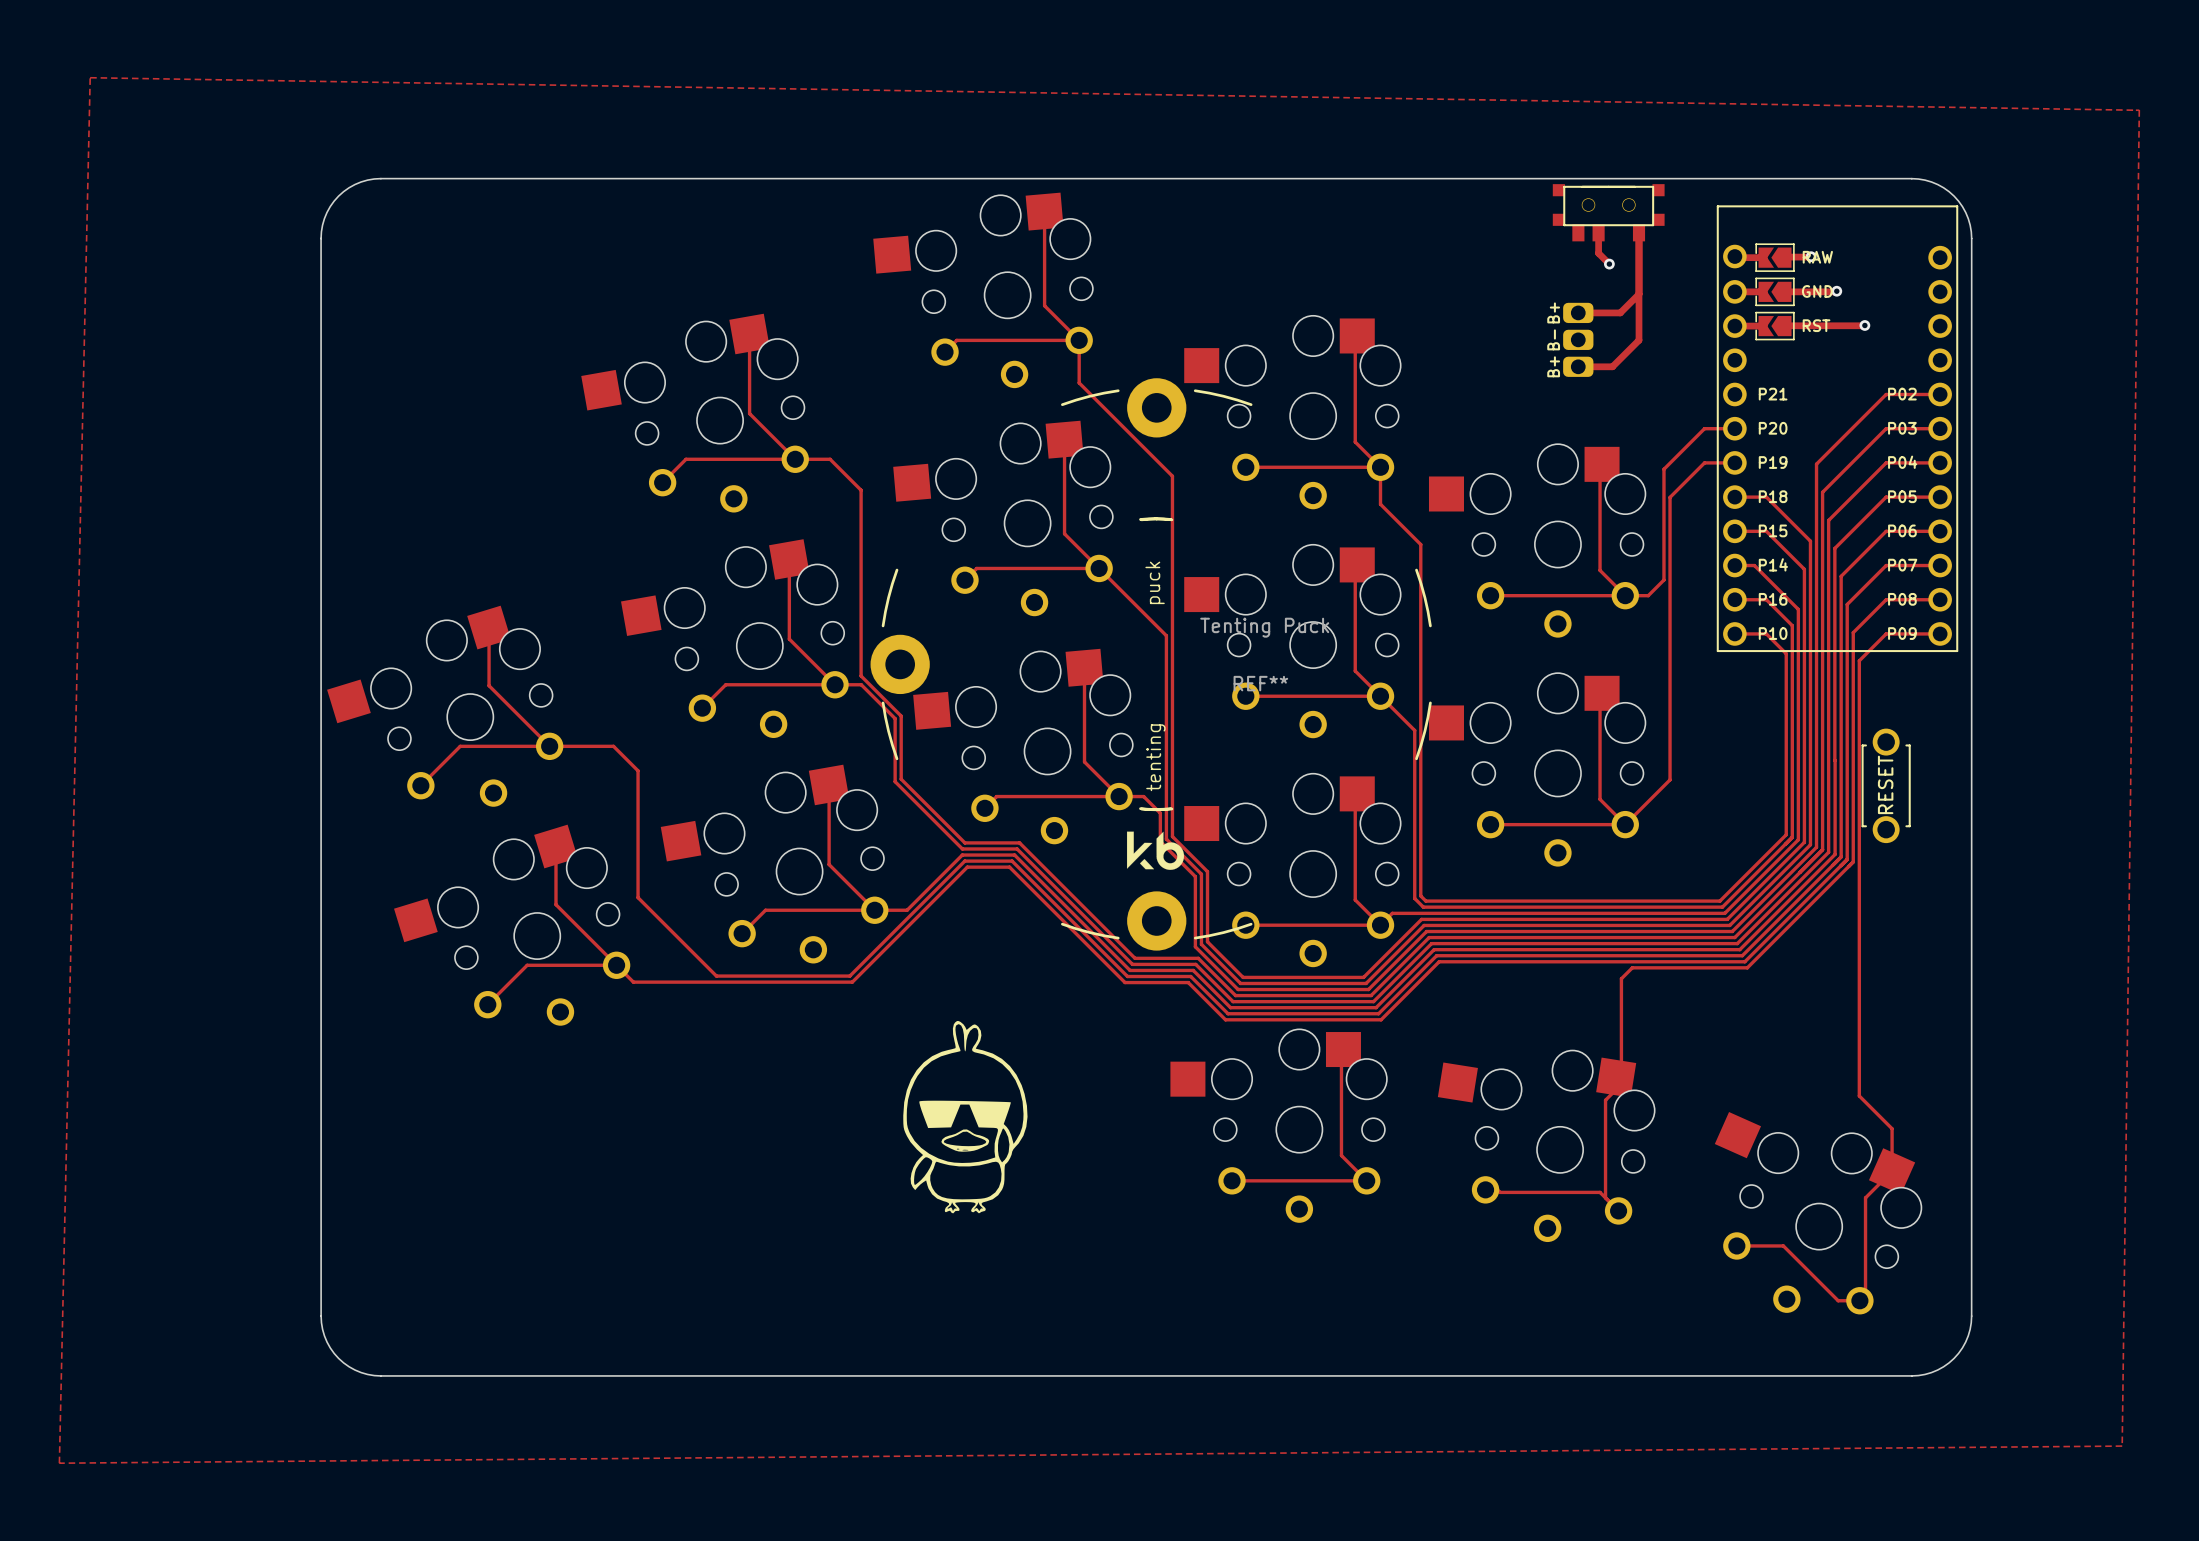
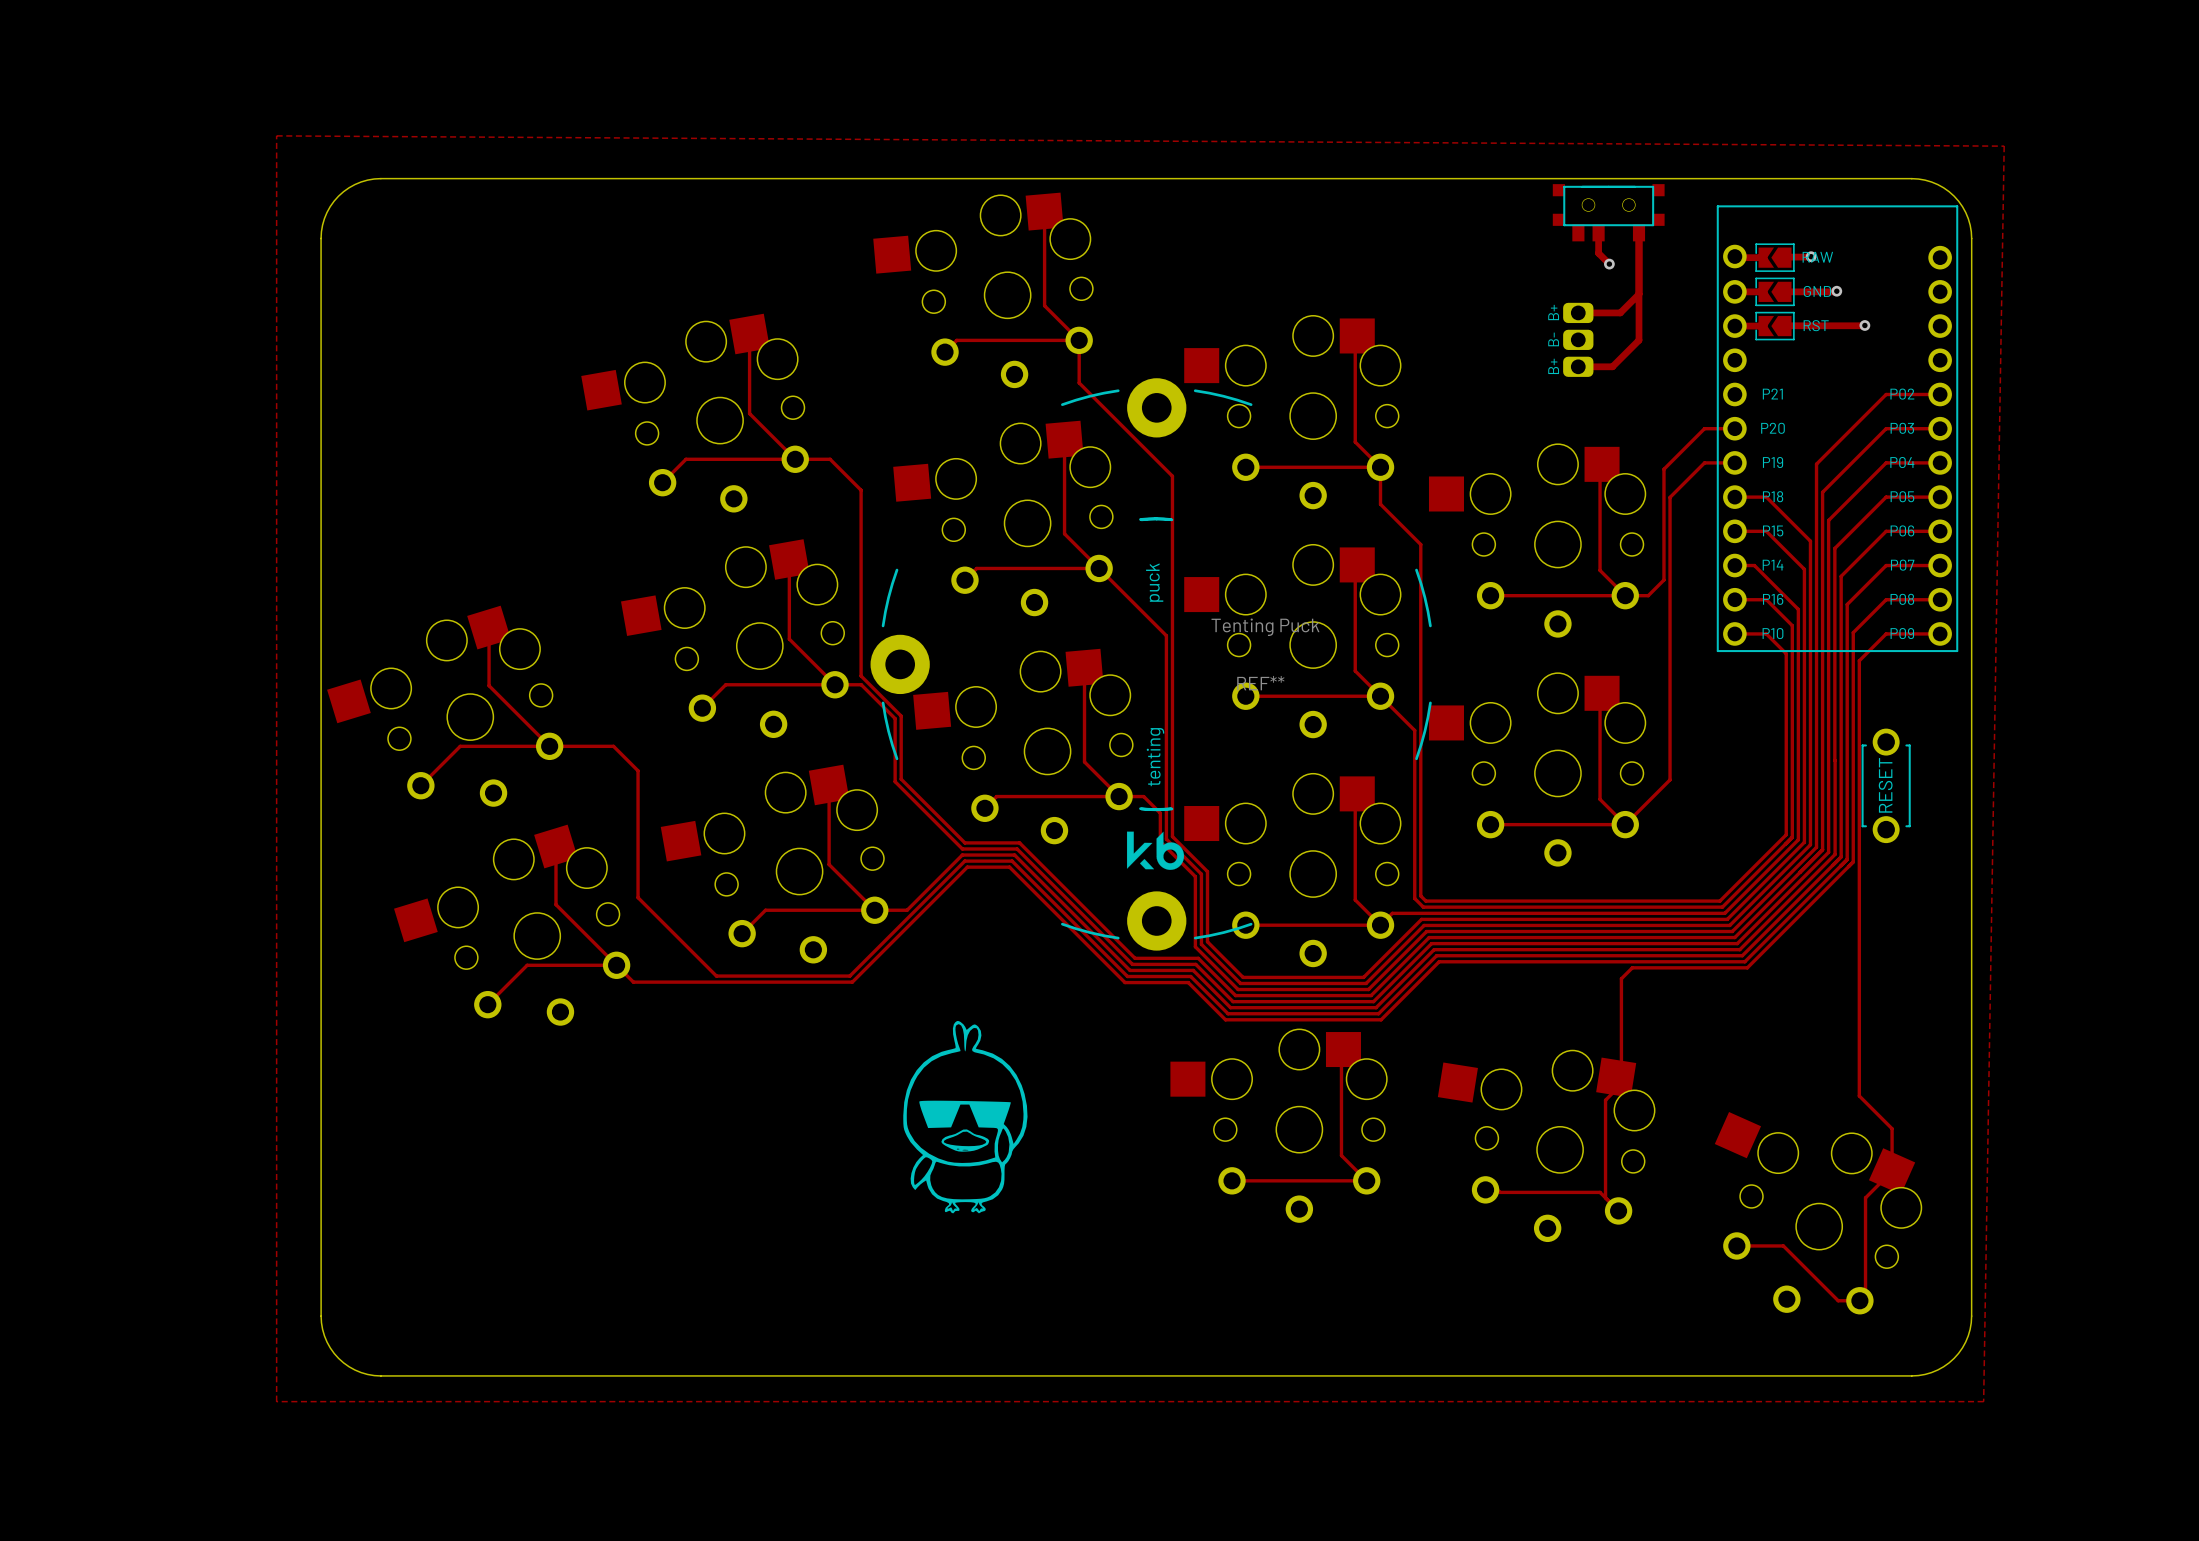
zone outline: (90, 77) (59, 1463) (2122, 1446) (2139, 110) (90, 77) -> (276, 135) (276, 1401) (1983, 1401) (2004, 146) (276, 135)

